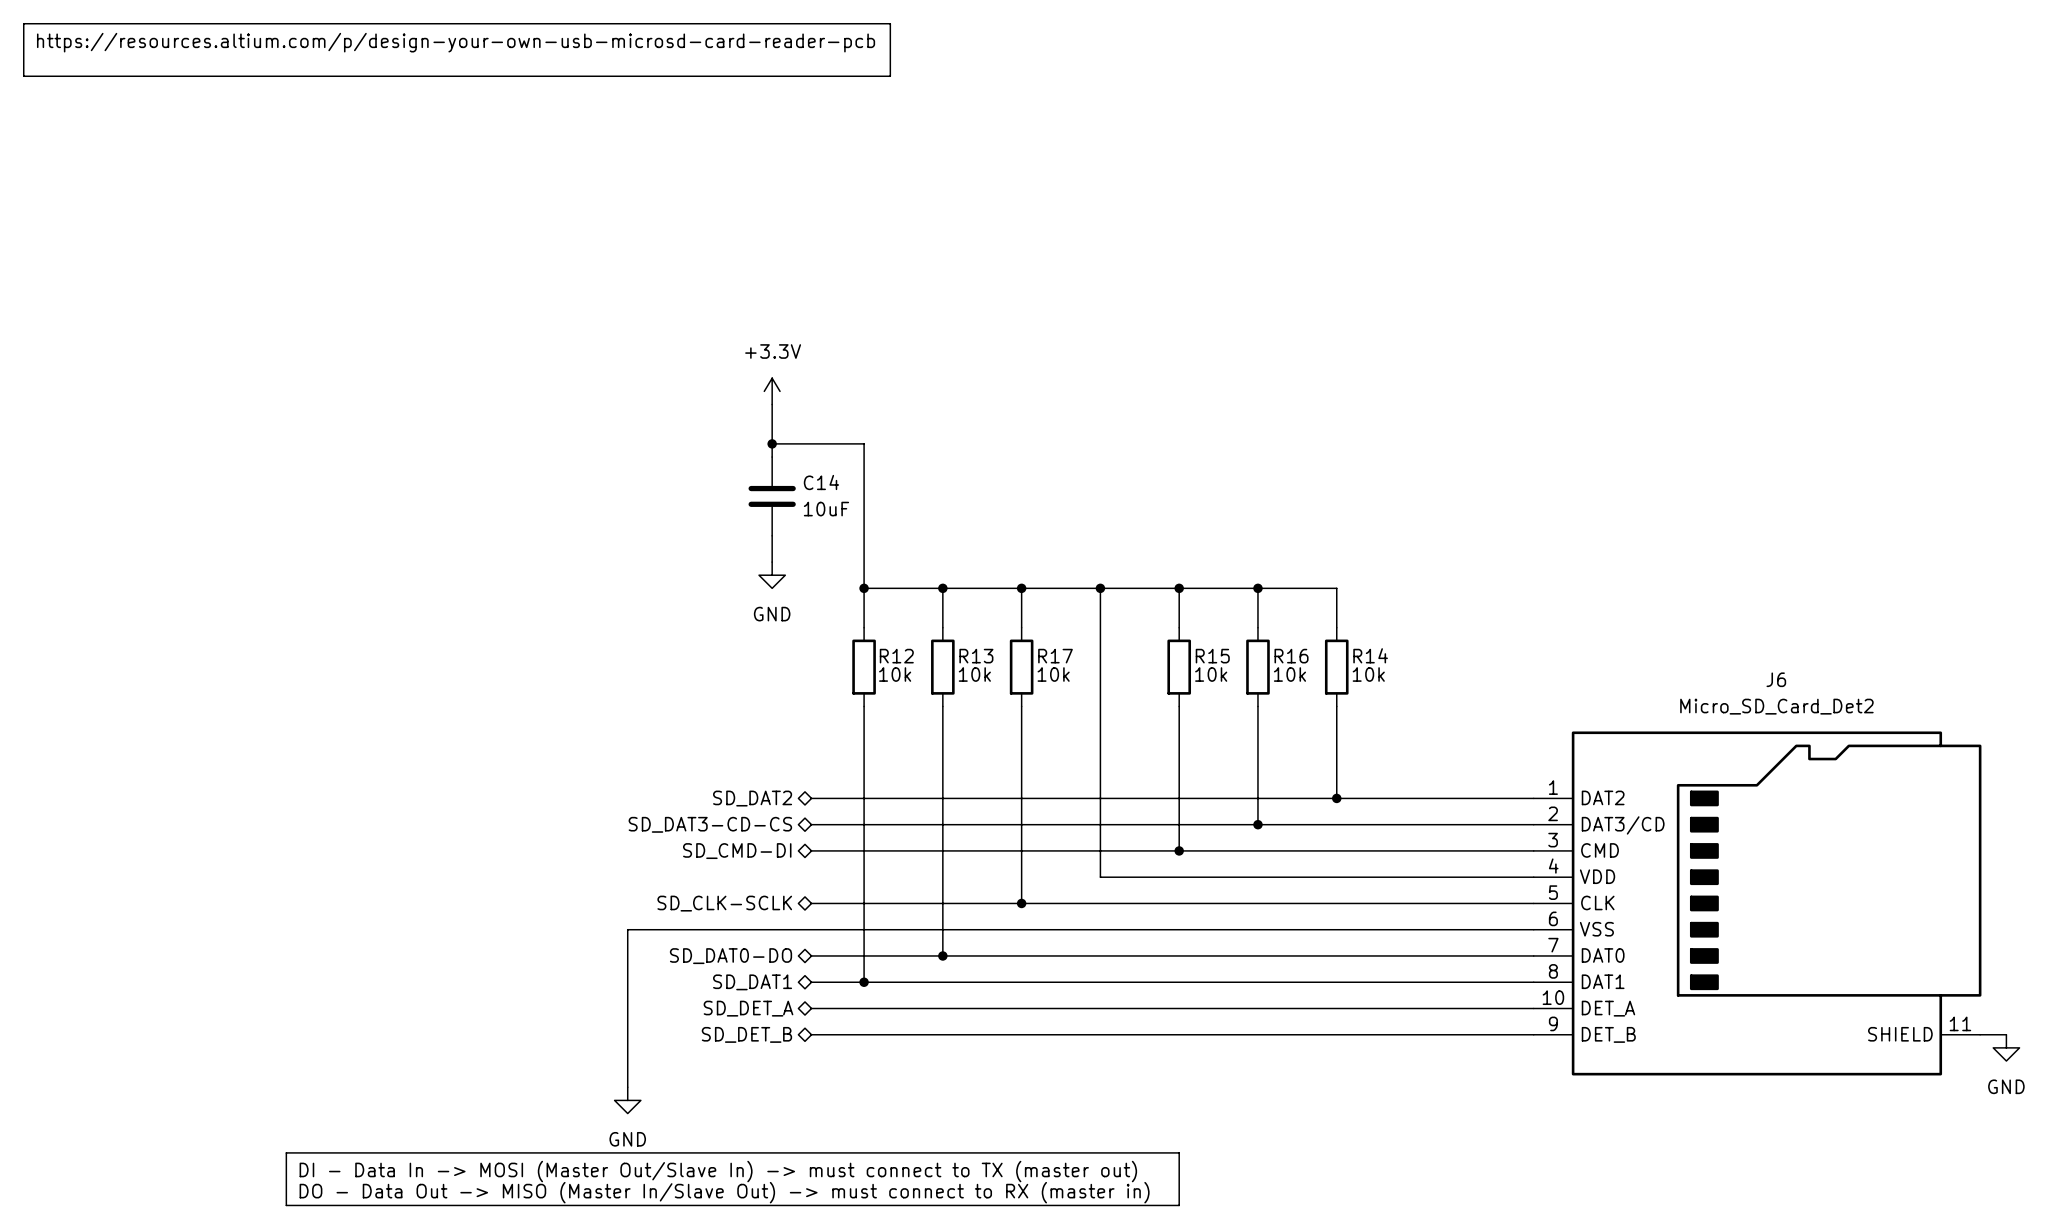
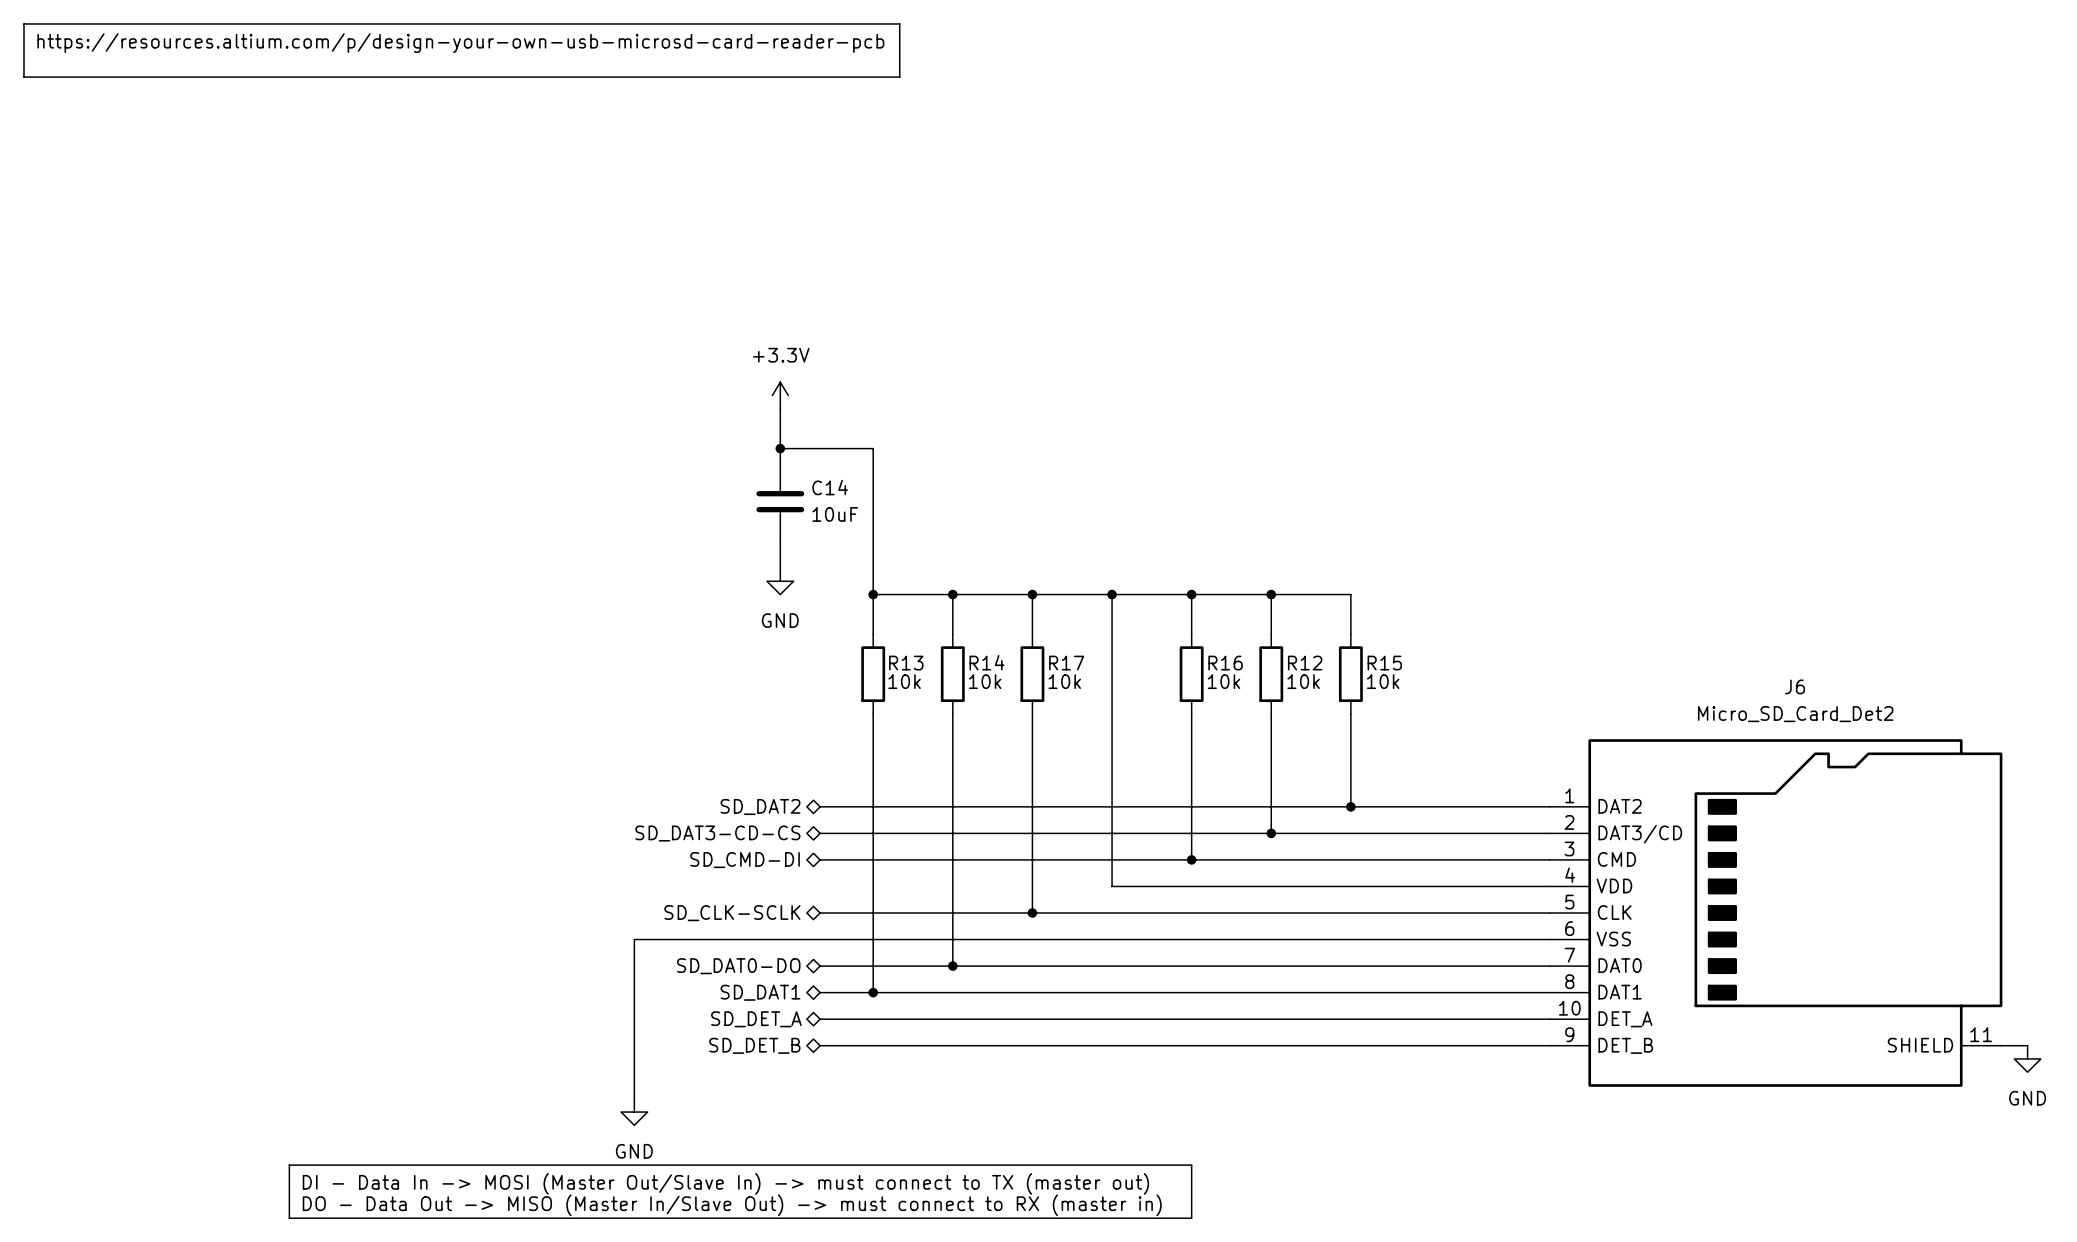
R14 name: R14 (1370, 655) -> R15 (1384, 663)
R12 name: R12 (896, 656) -> R13 (906, 663)
R13 name: R13 (976, 656) -> R14 (987, 662)
R15 name: R15 (1212, 656) -> R16 (1225, 663)
R16 name: R16 (1291, 656) -> R12 (1305, 663)

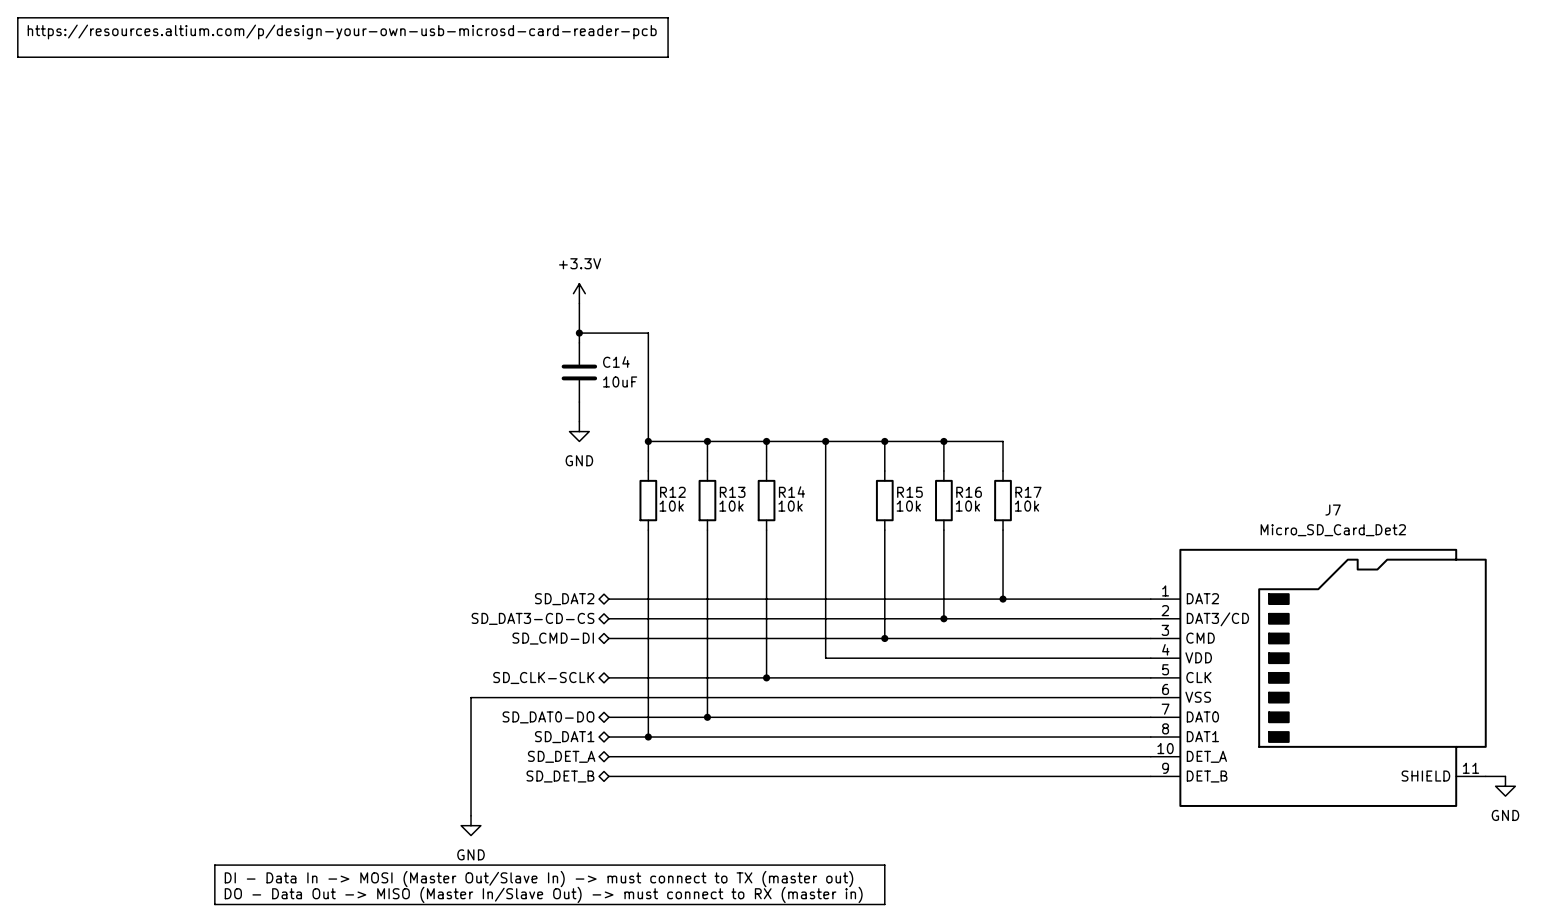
R14 name: R14 (987, 662) -> R13 (732, 492)
R13 name: R13 (906, 663) -> R12 (672, 492)
R17 name: R17 (1066, 663) -> R14 (791, 492)
R16 name: R16 (1225, 663) -> R15 (909, 492)
R12 name: R12 (1305, 663) -> R16 (969, 492)
R15 name: R15 (1384, 663) -> R17 (1028, 492)
J6 name: J6 (1795, 686) -> J7 (1333, 510)

